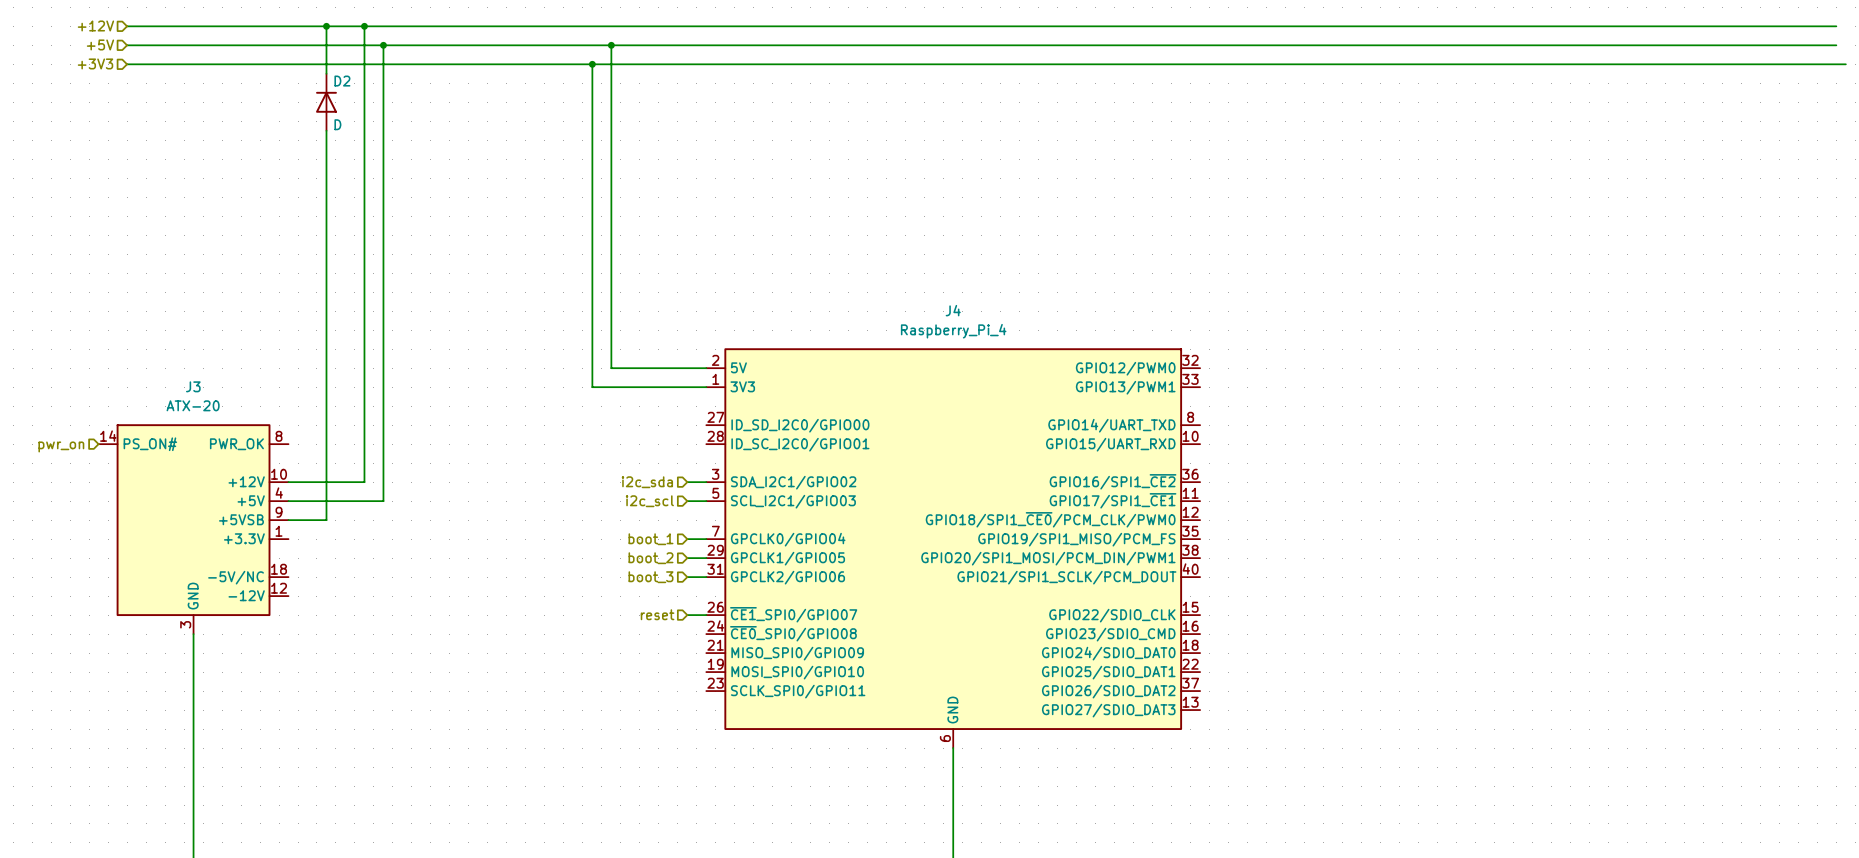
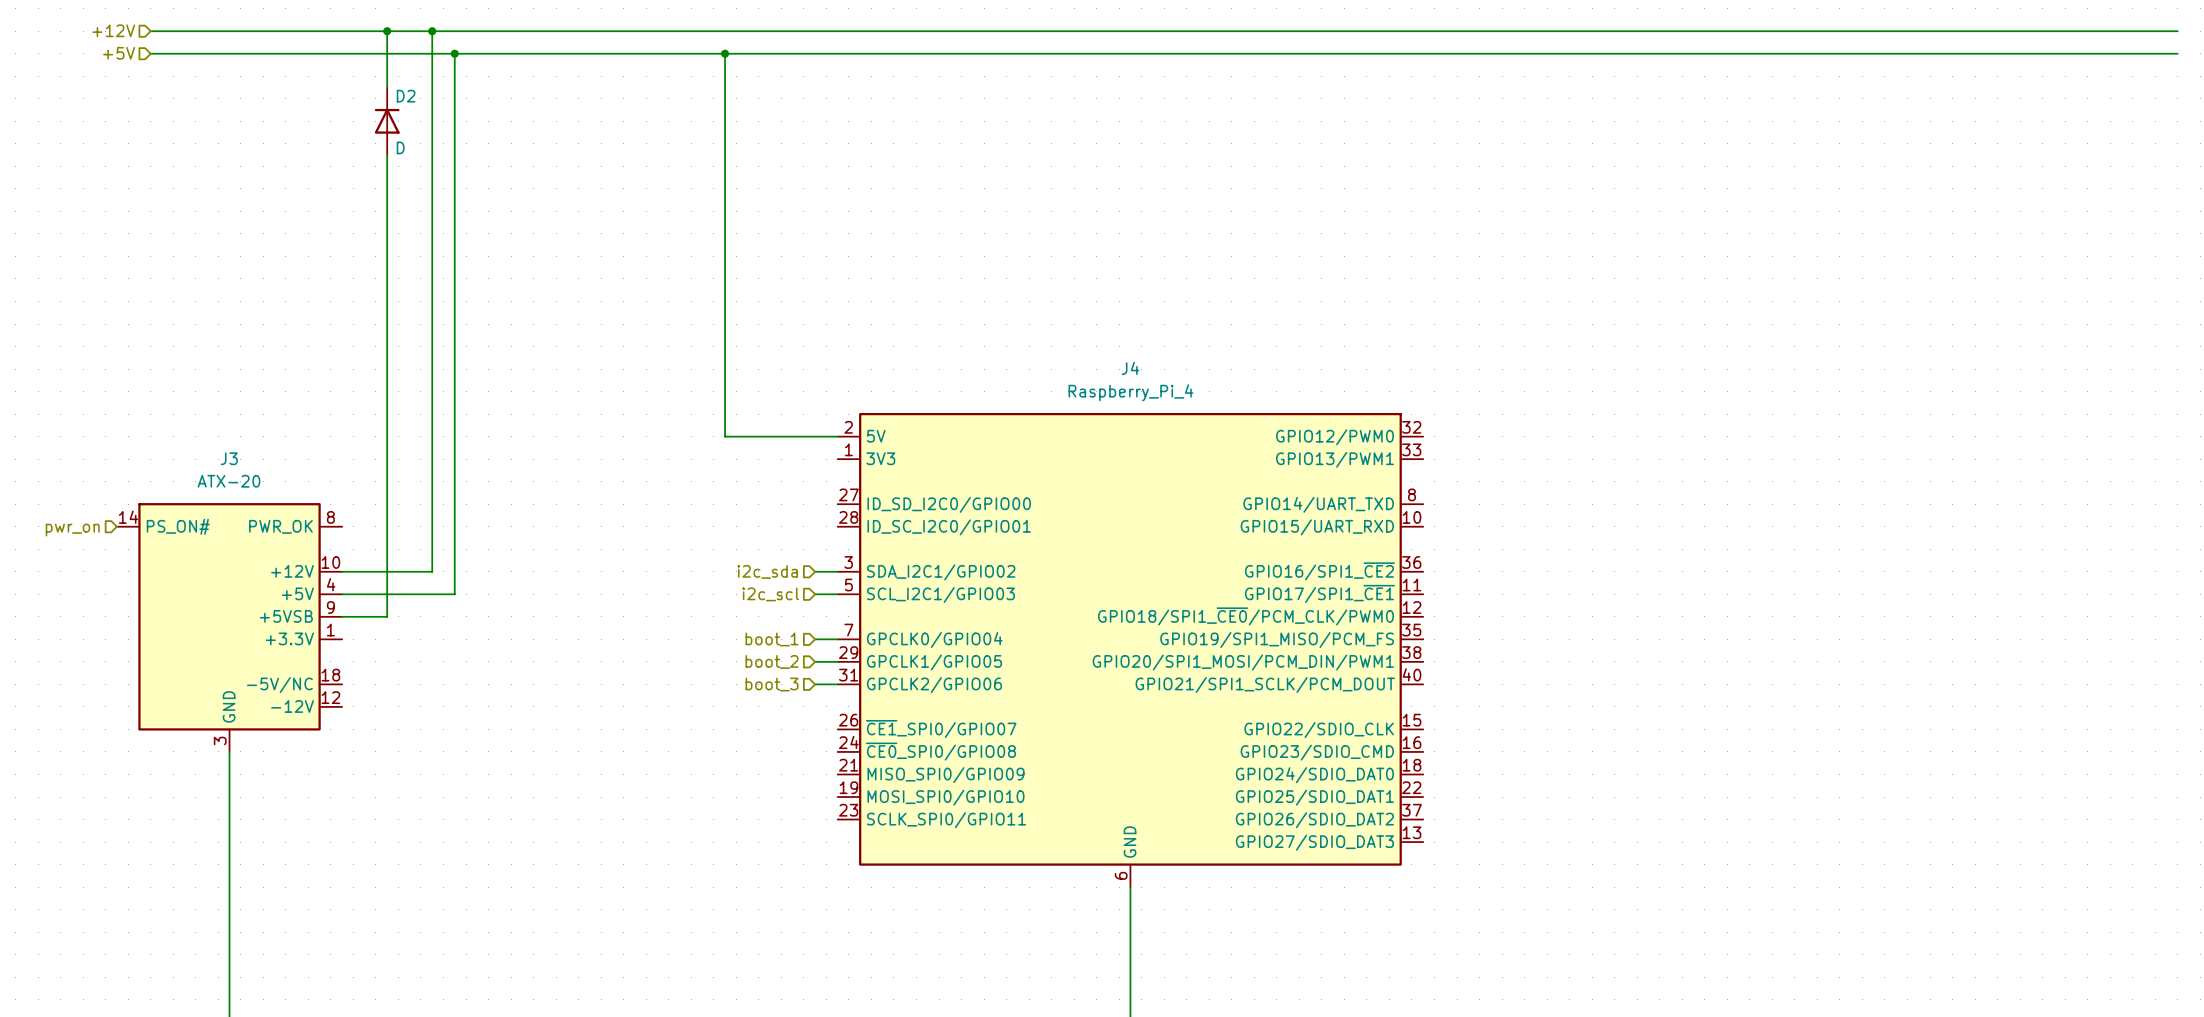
hierarchical label: +3V3 (95, 63) -> none
wire: (127, 64) (1845, 64) -> none
wire: (592, 64) (592, 387) (706, 387) -> none
junction: (592, 64) -> none
hierarchical label: reset (657, 614) -> none
wire: (687, 615) (706, 615) -> none

